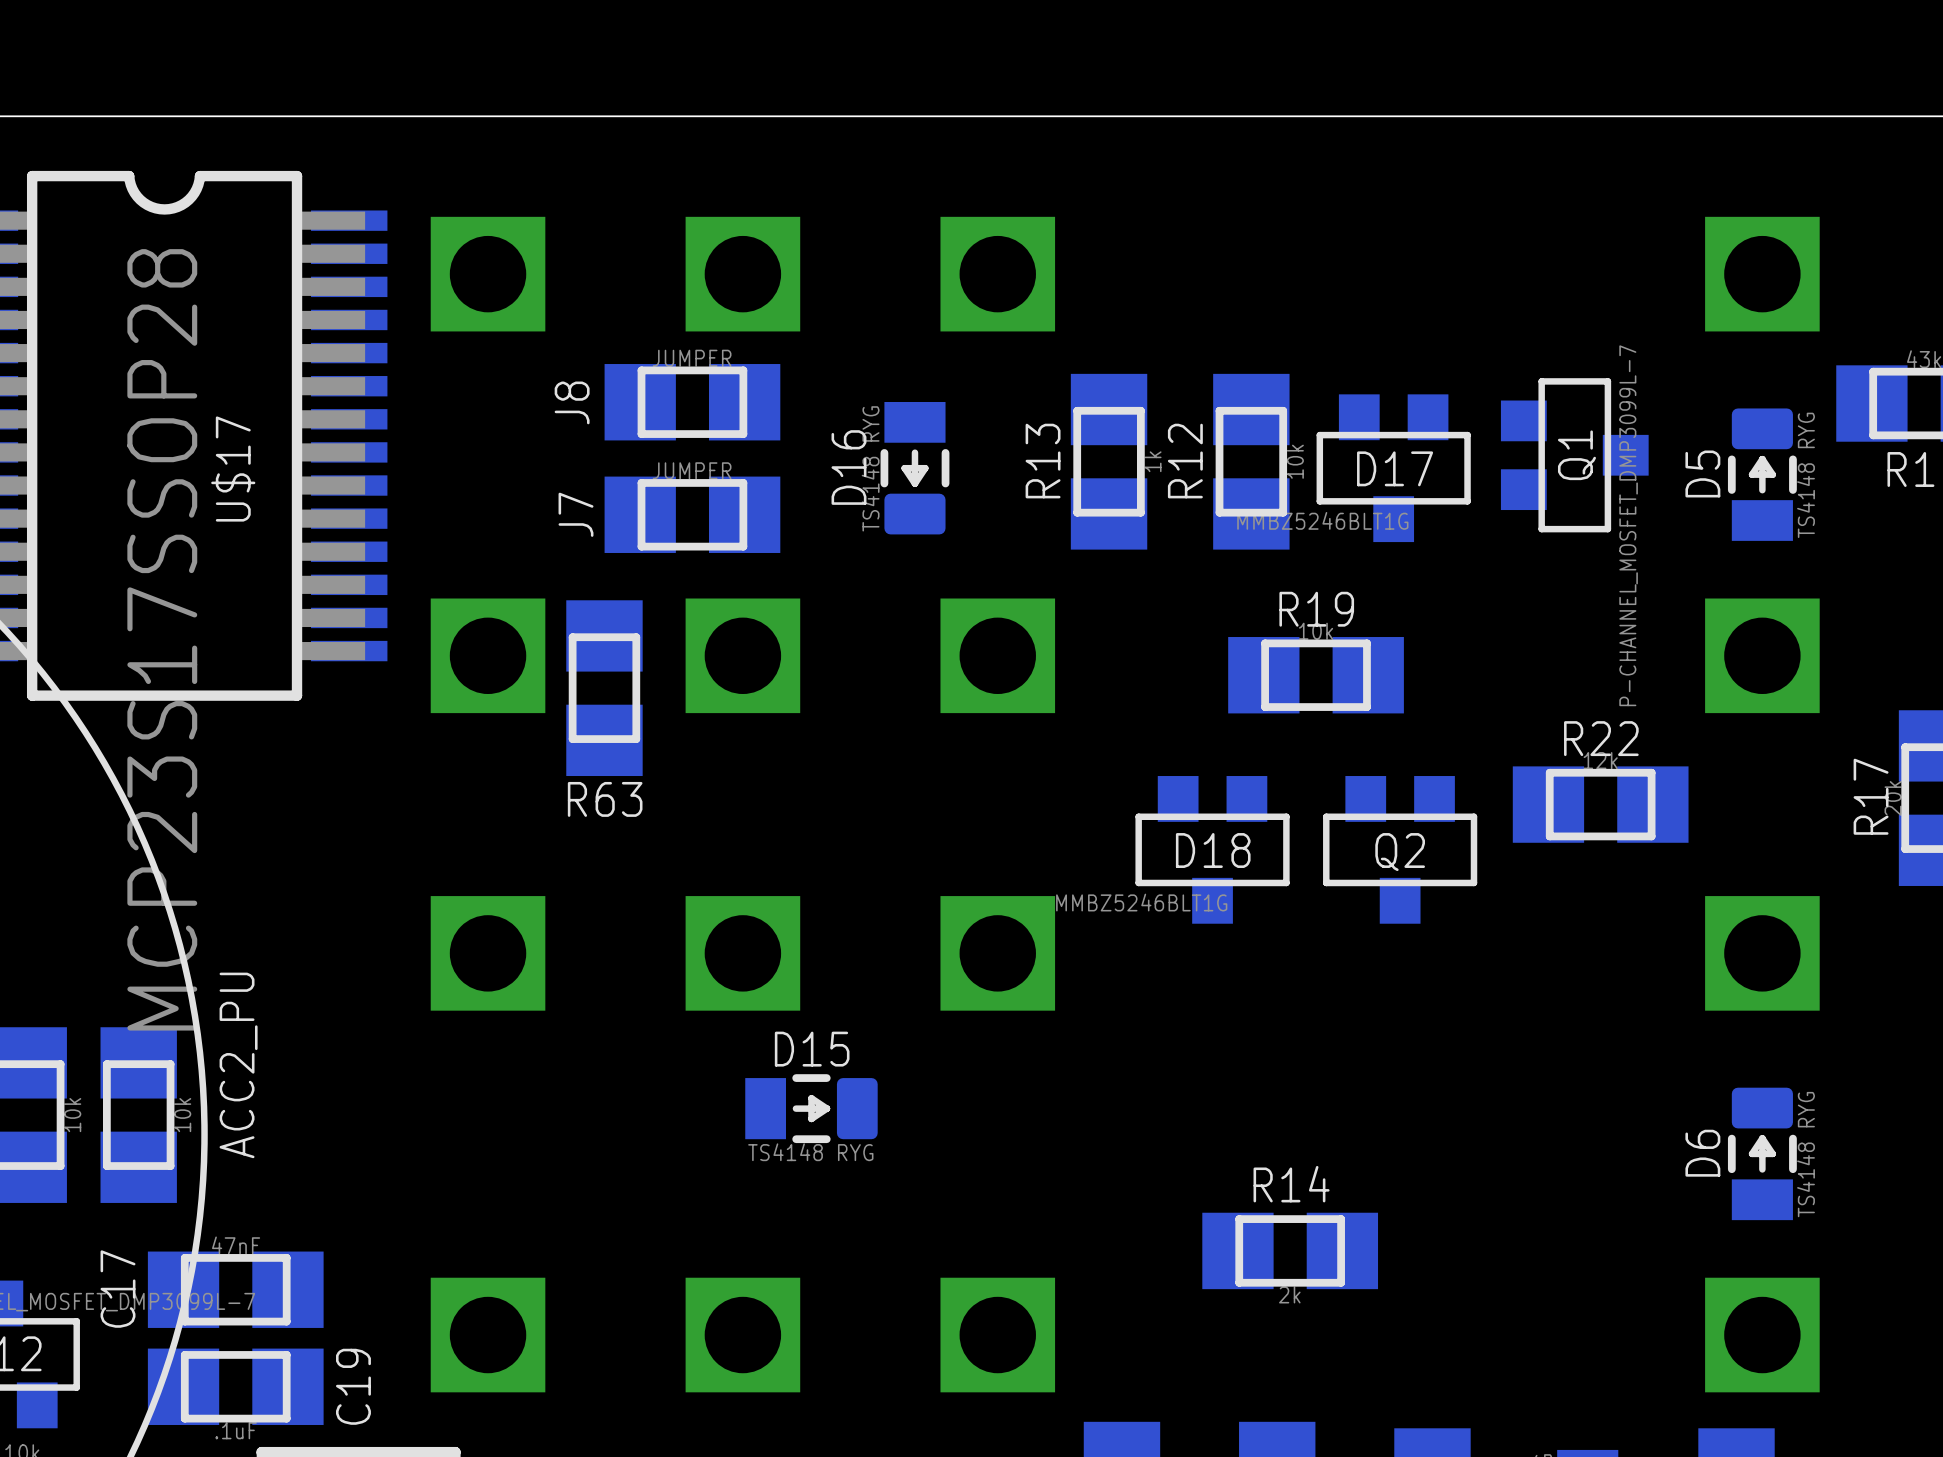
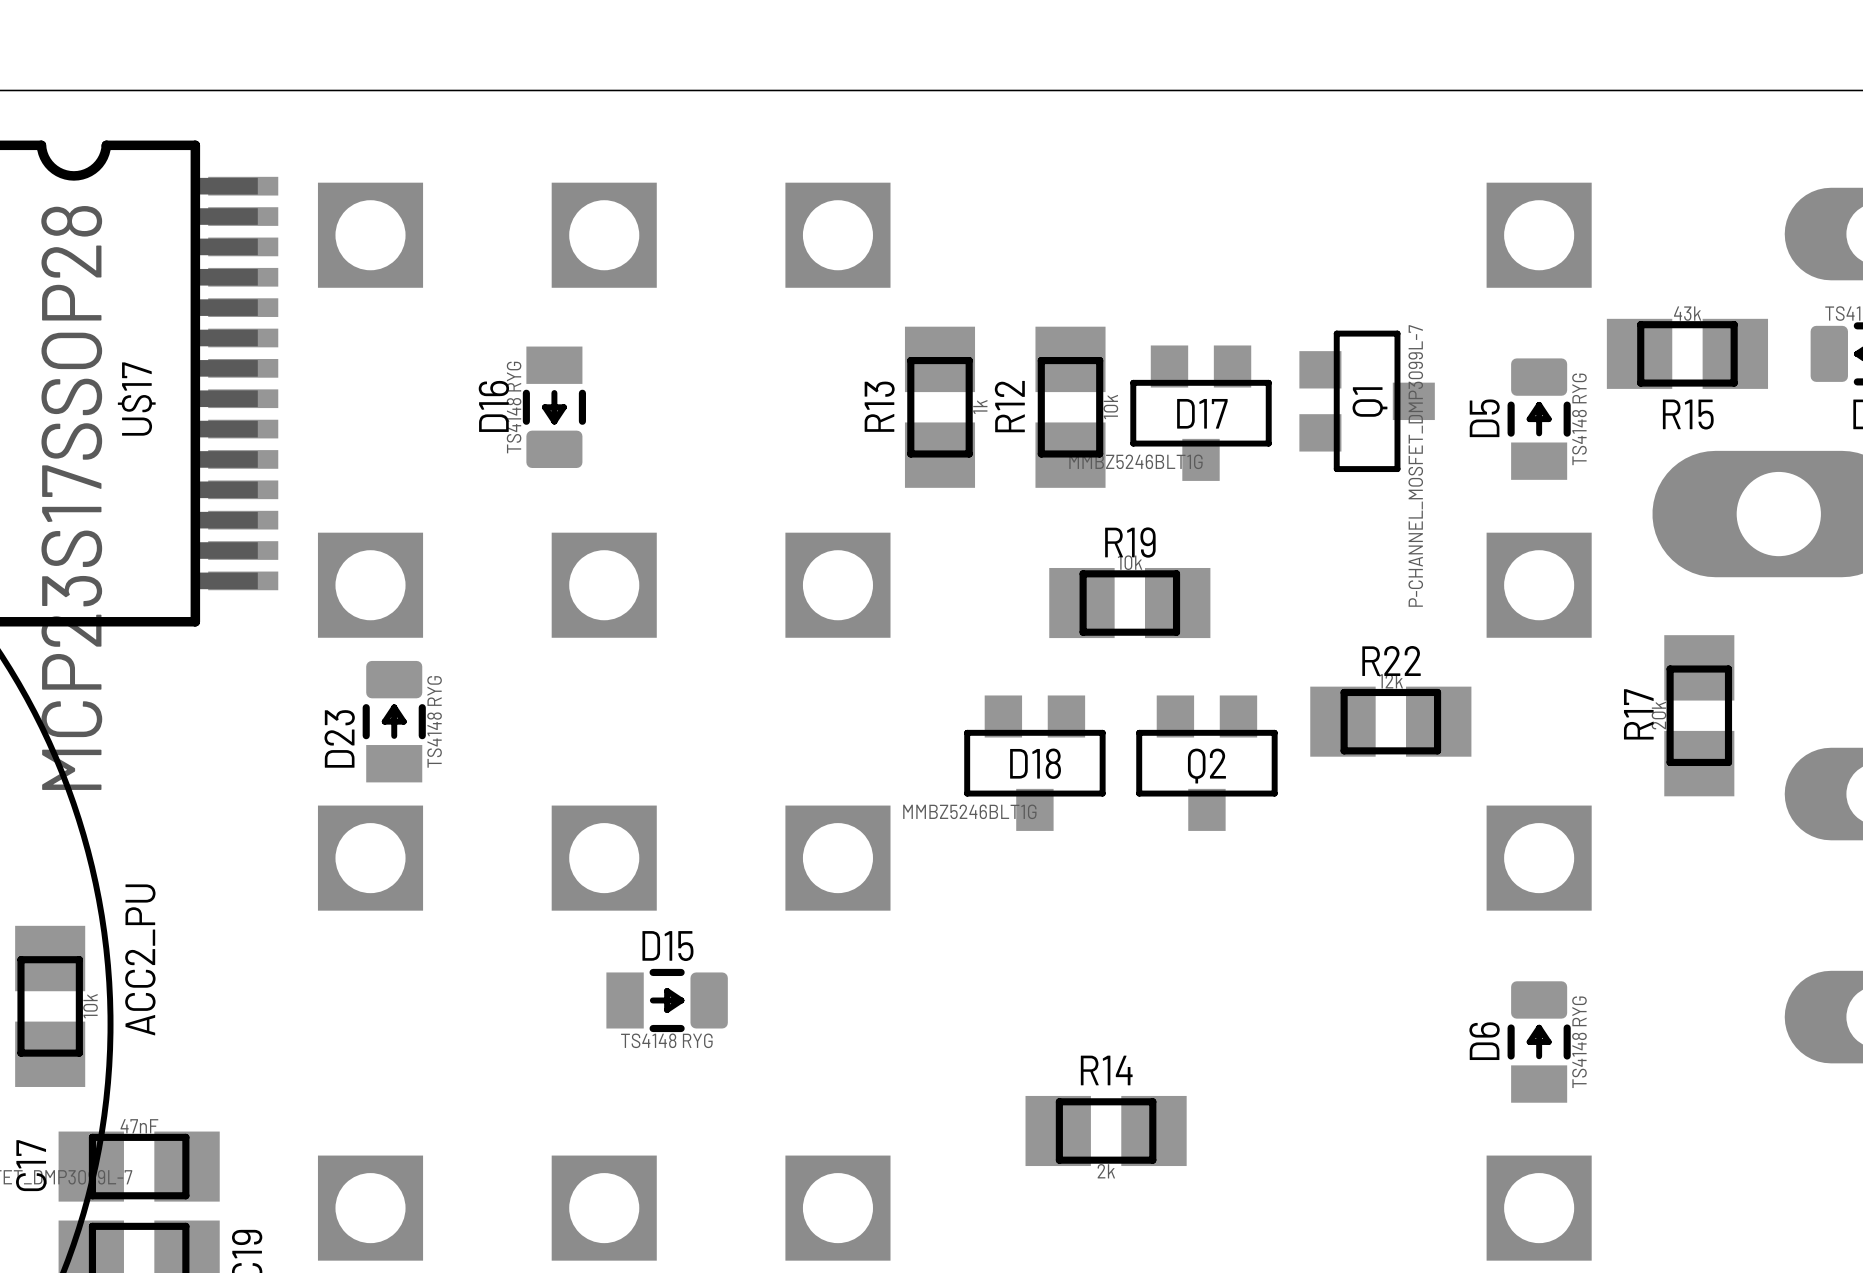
J8: JUMPER (692, 402) -> none
D16 position: (914, 468) -> (554, 407)
J7: JUMPER (692, 514) -> none
R63: (604, 688) -> none
D23: none -> TS4148 RYG (394, 721)

